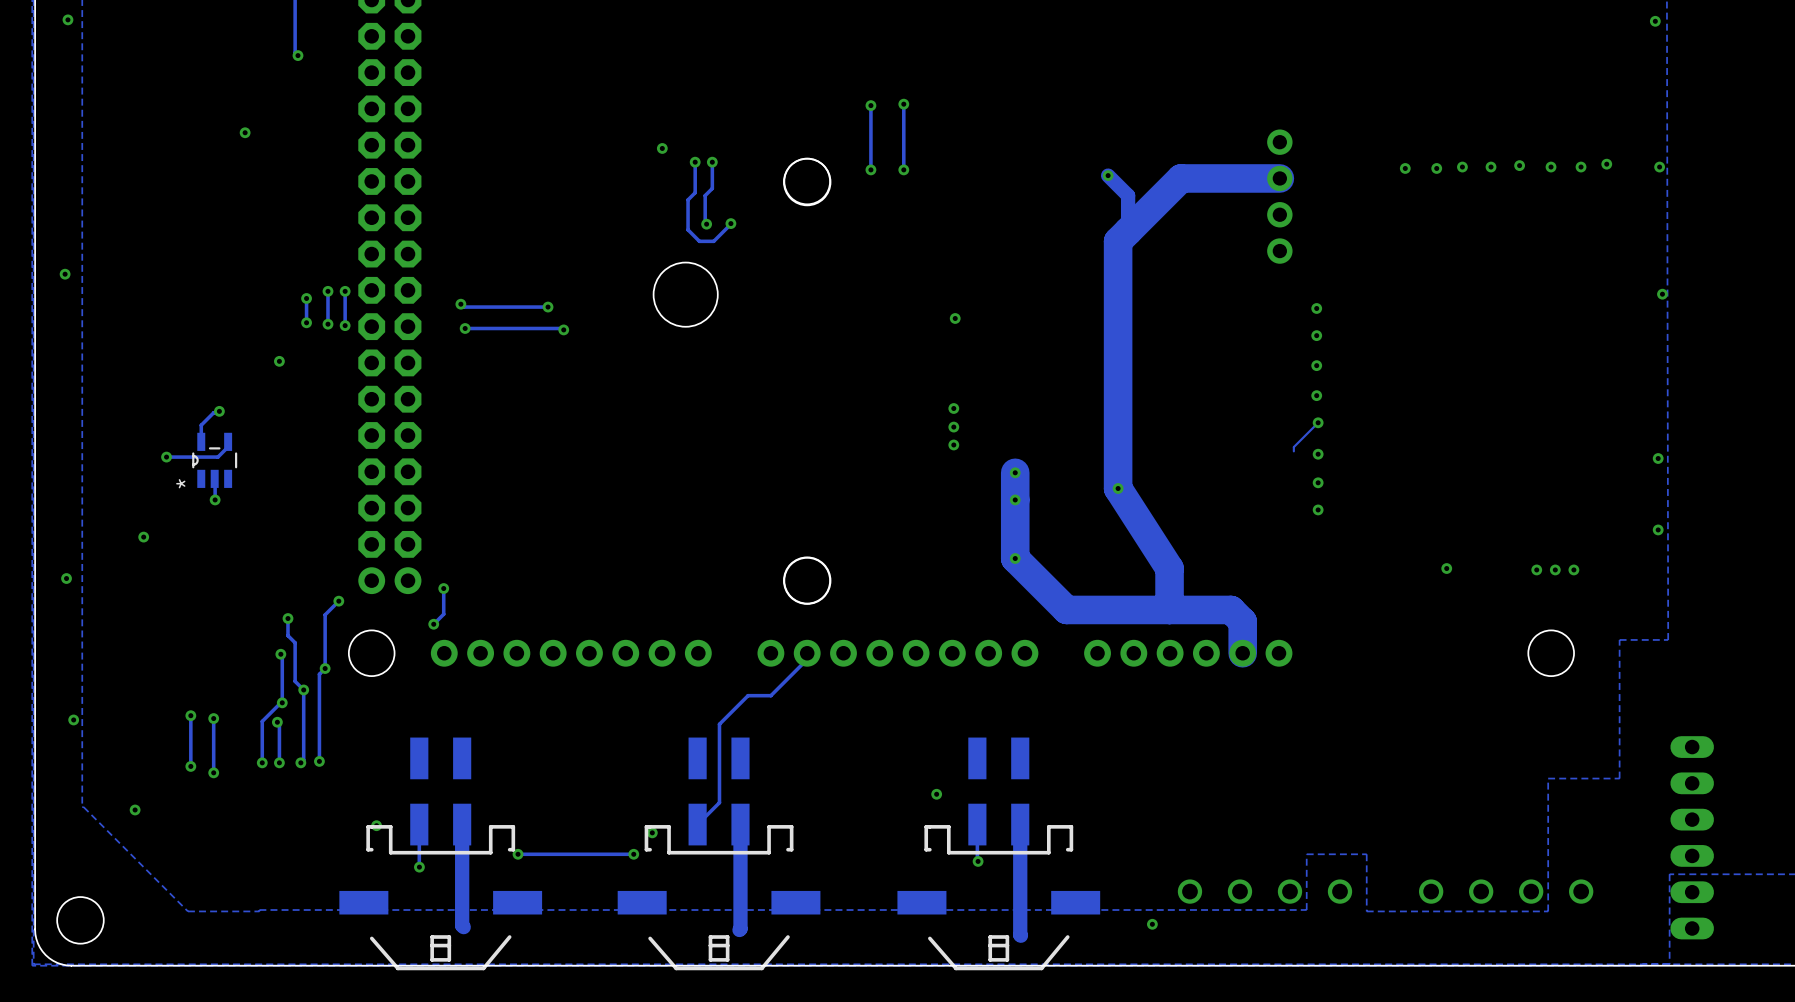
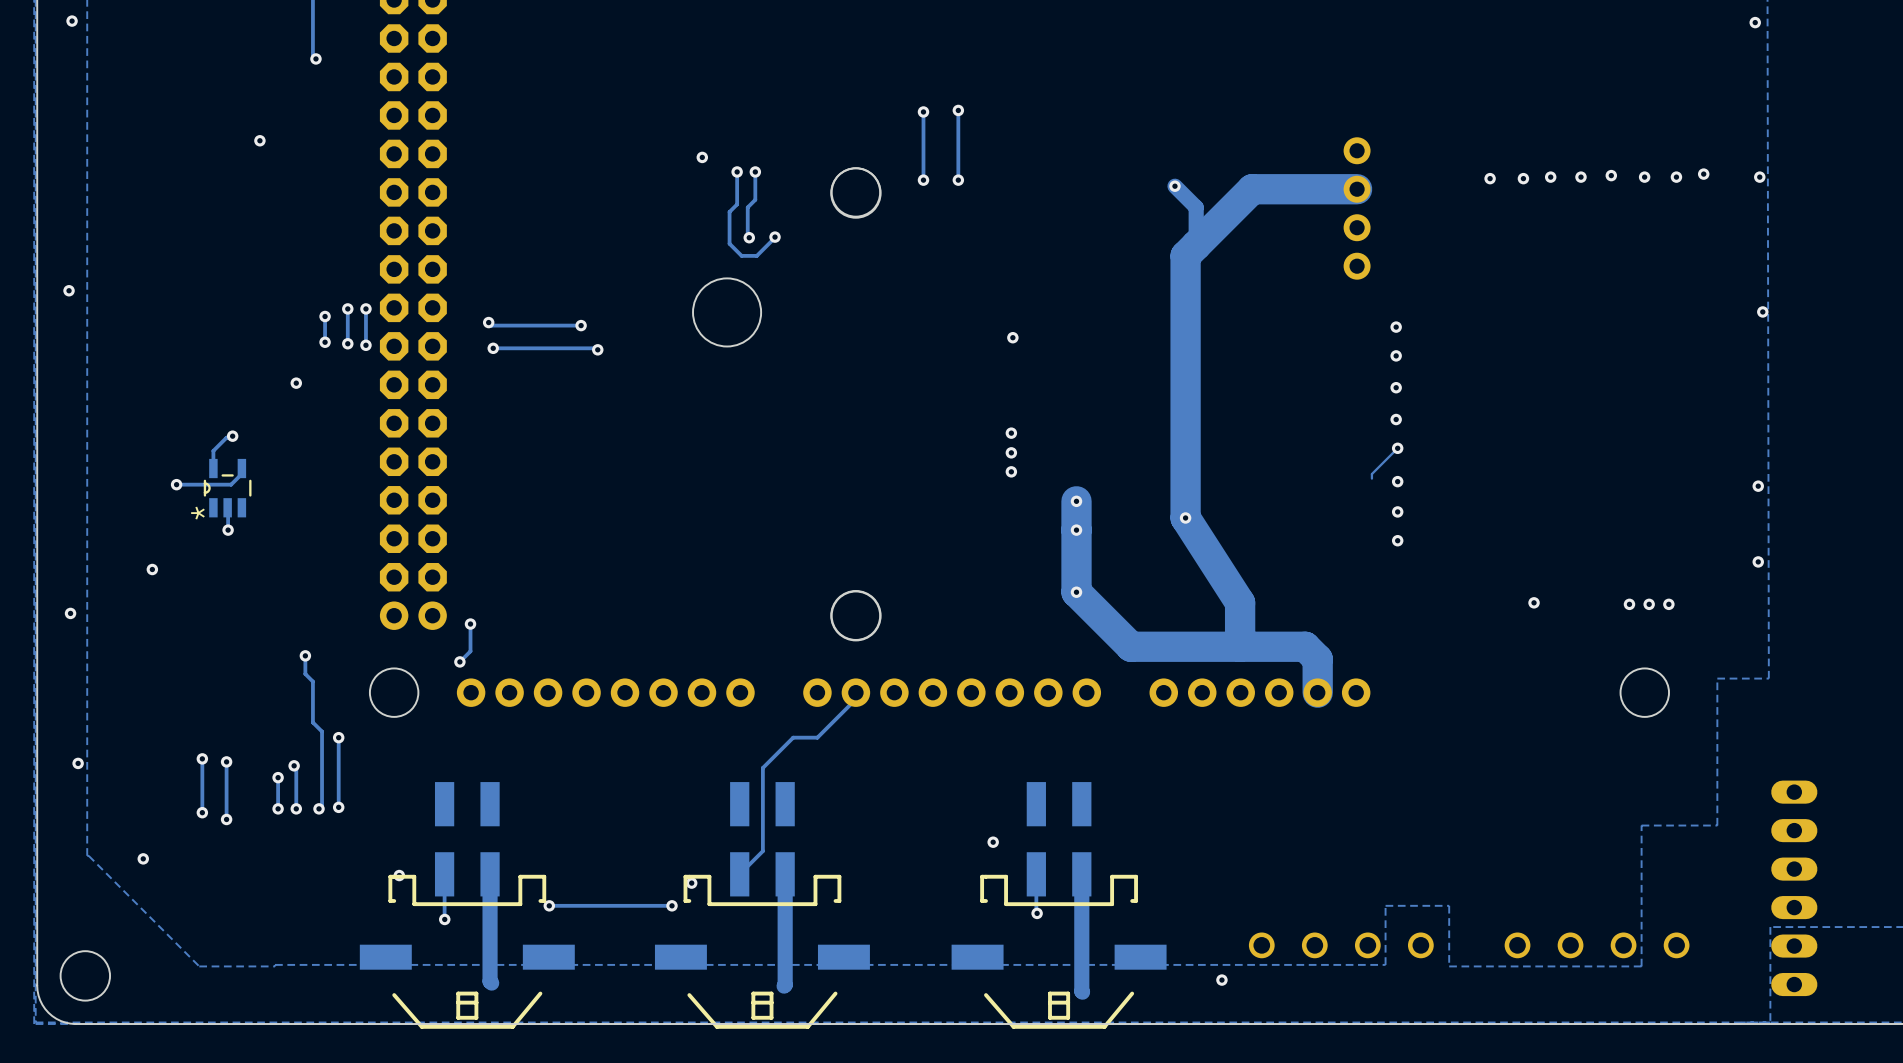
track: (338, 601) (325, 614) (325, 668) (319, 674) (319, 695) -> none
via: (338, 601) -> none
track: (280, 654) (282, 702) -> none
via: (280, 654) -> none
via: (325, 668) -> none
via: (303, 689) -> none
via: none -> (338, 737)
track: (282, 701) (262, 721) (262, 733) -> none
via: (282, 702) -> none
via: none -> (278, 777)

